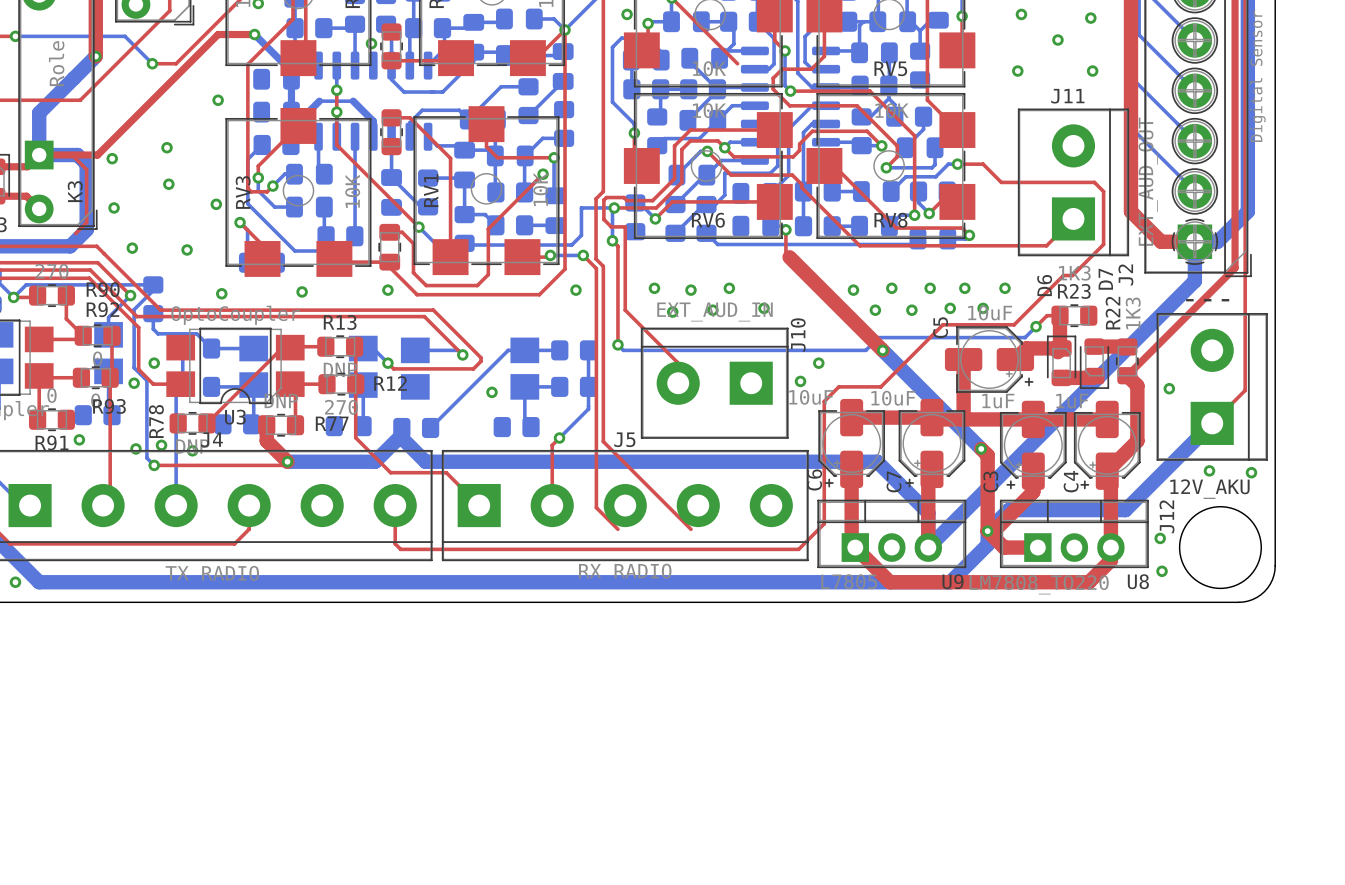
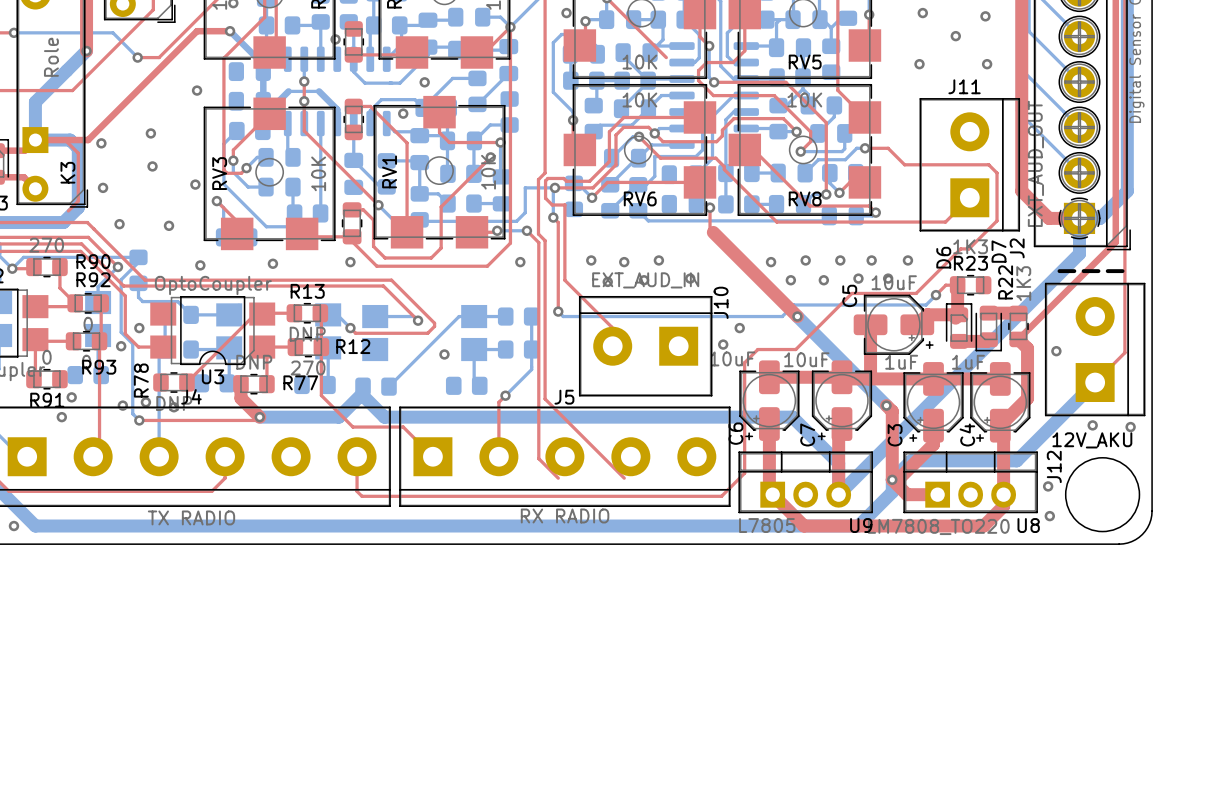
via: none -> (424, 82)
via: none -> (403, 113)
via: none -> (61, 417)

